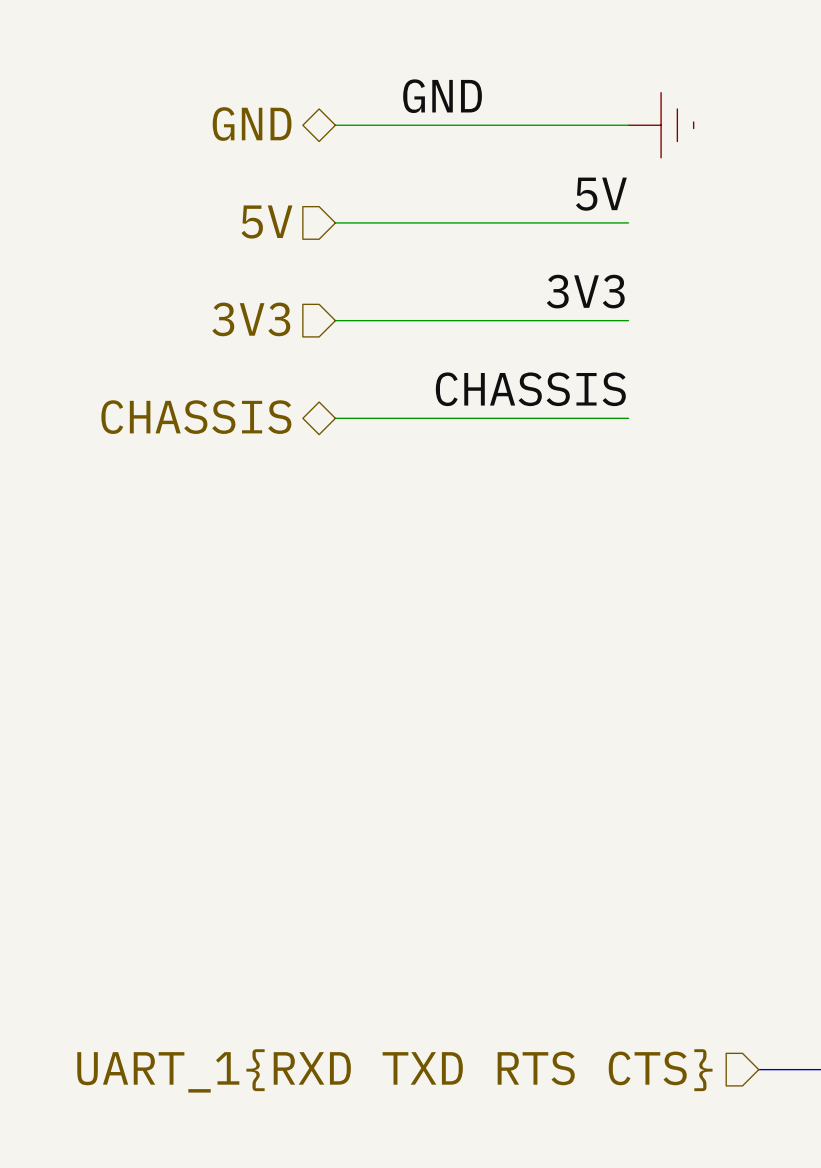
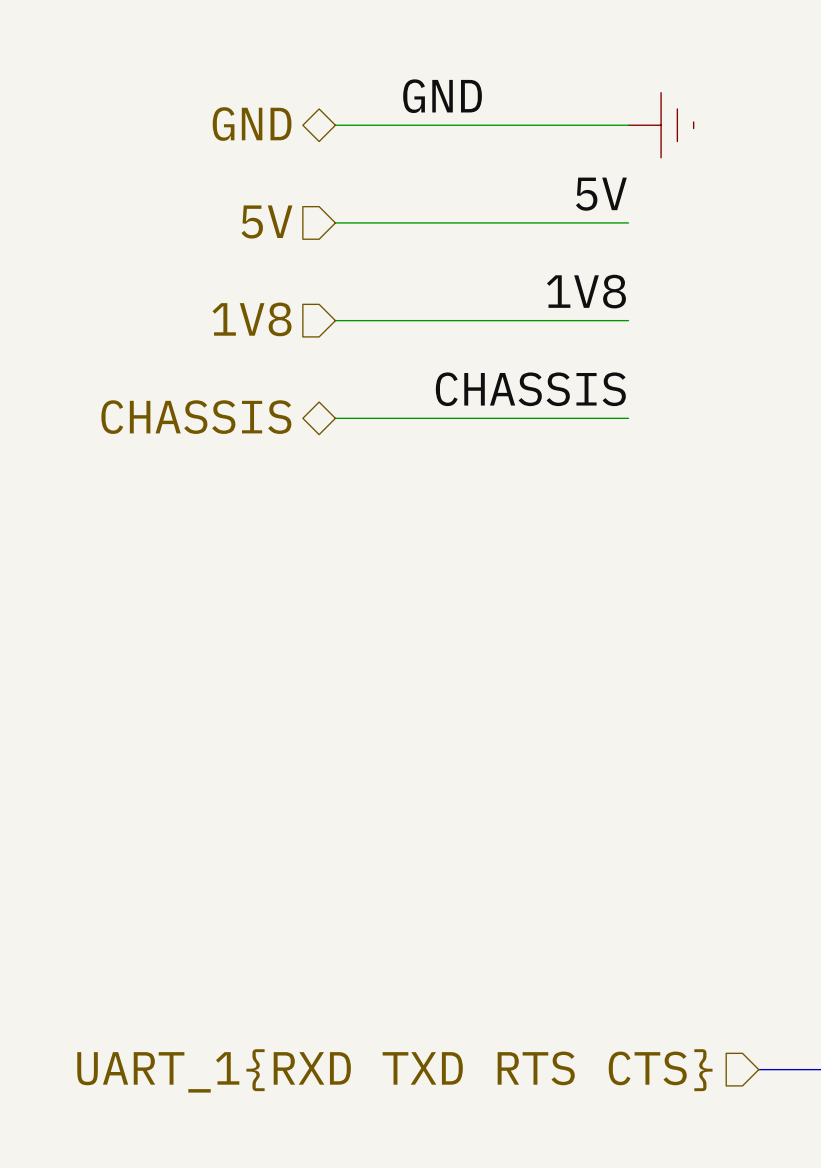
label: 3V3 (585, 291) -> 1V8 (586, 291)
hierarchical label: 3V3 (251, 319) -> 1V8 (252, 319)

